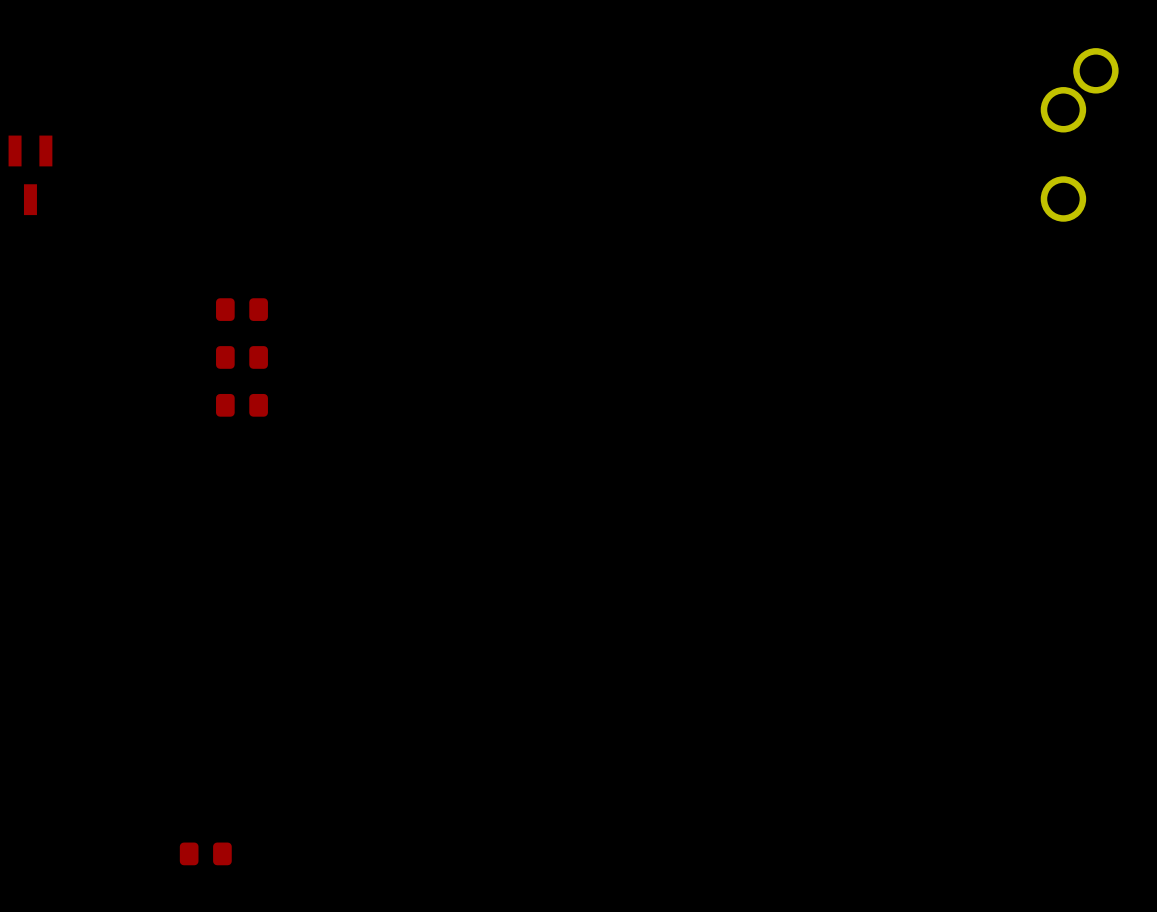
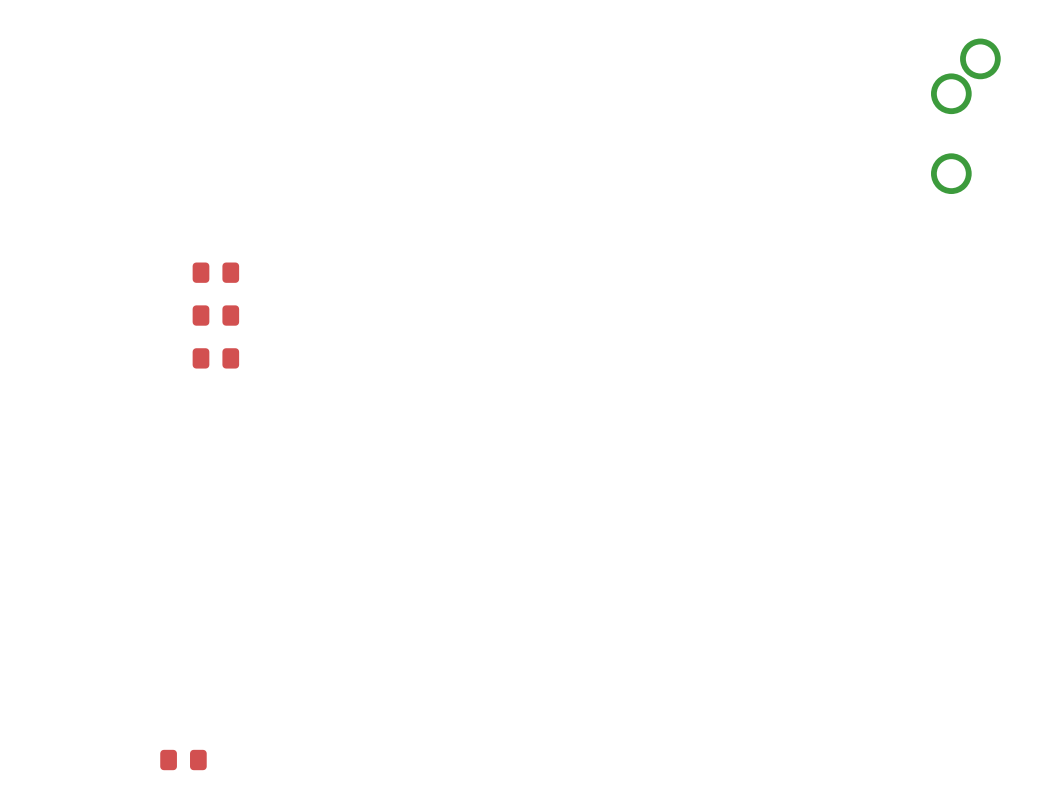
part: (30, 175) -> none

